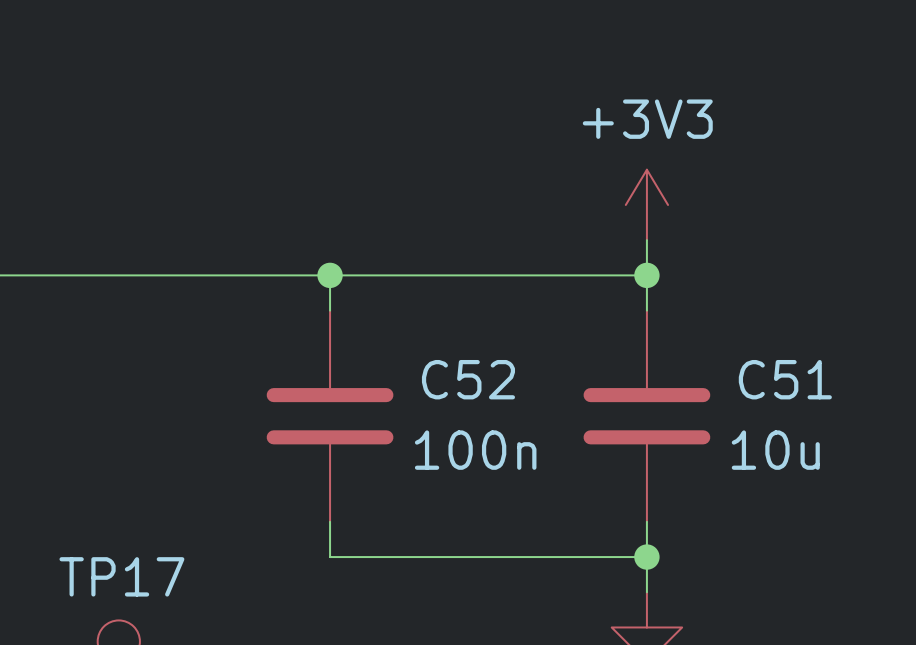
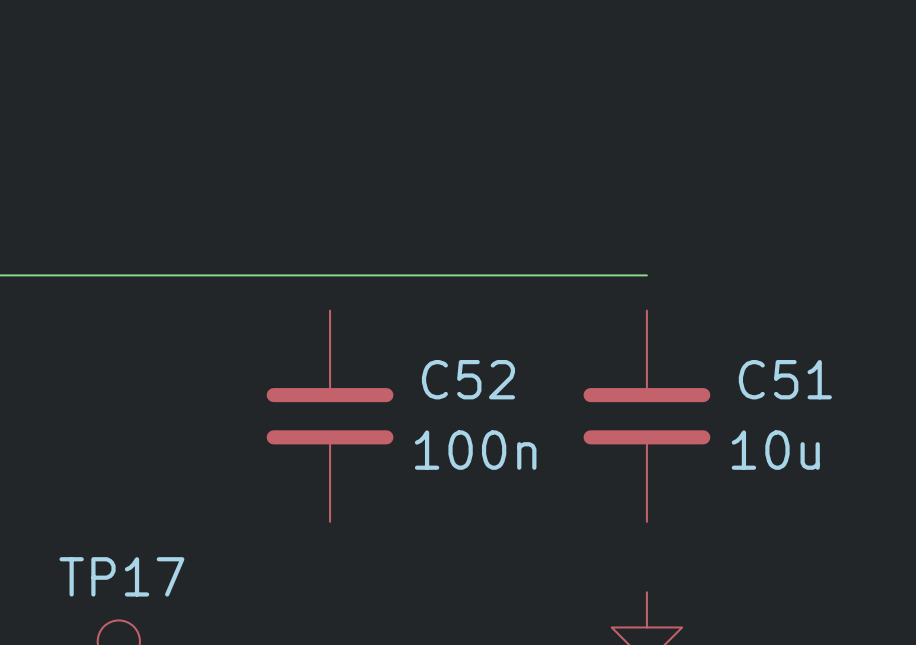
power symbol: +3V3 (646, 204) -> none
wire: (646, 240) (646, 310) -> none
wire: (330, 275) (330, 310) -> none
junction: (330, 275) -> none
junction: (646, 275) -> none
wire: (330, 521) (330, 557) (646, 557) -> none
wire: (646, 521) (646, 592) -> none
junction: (646, 557) -> none

